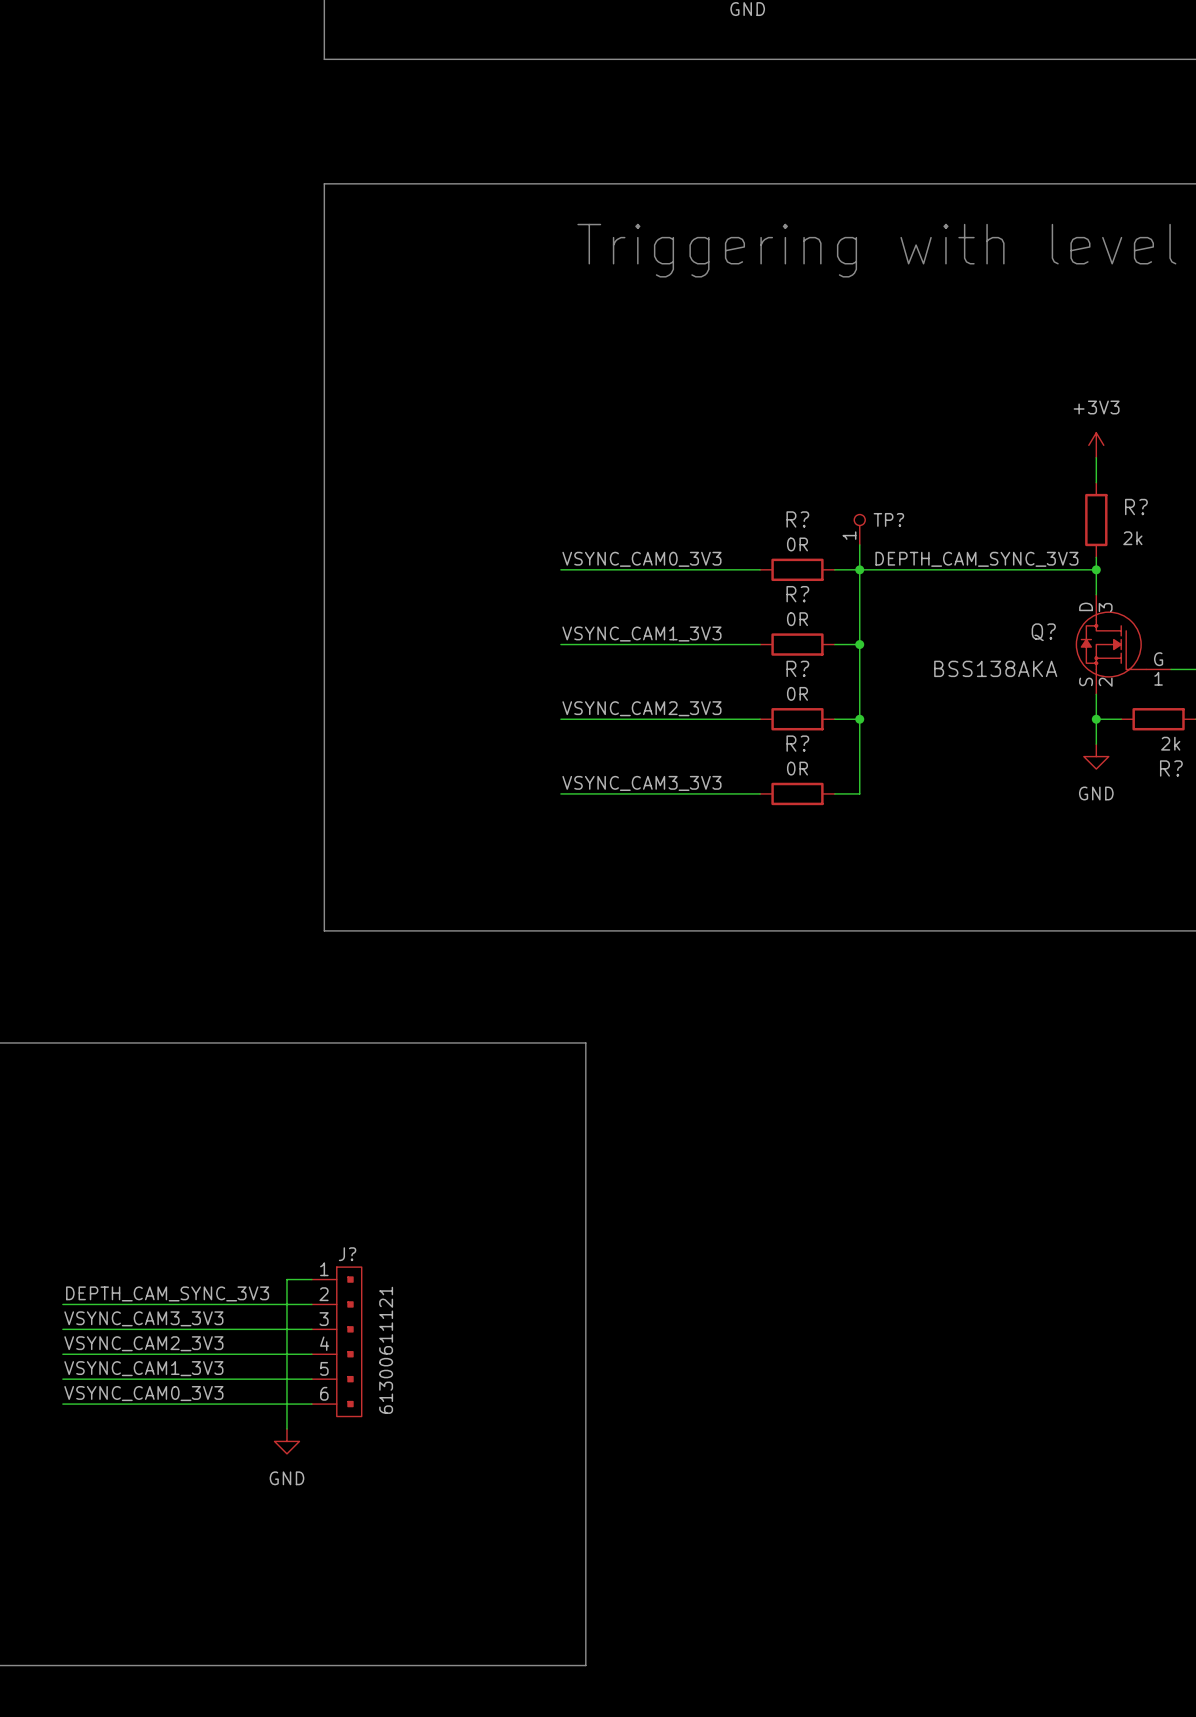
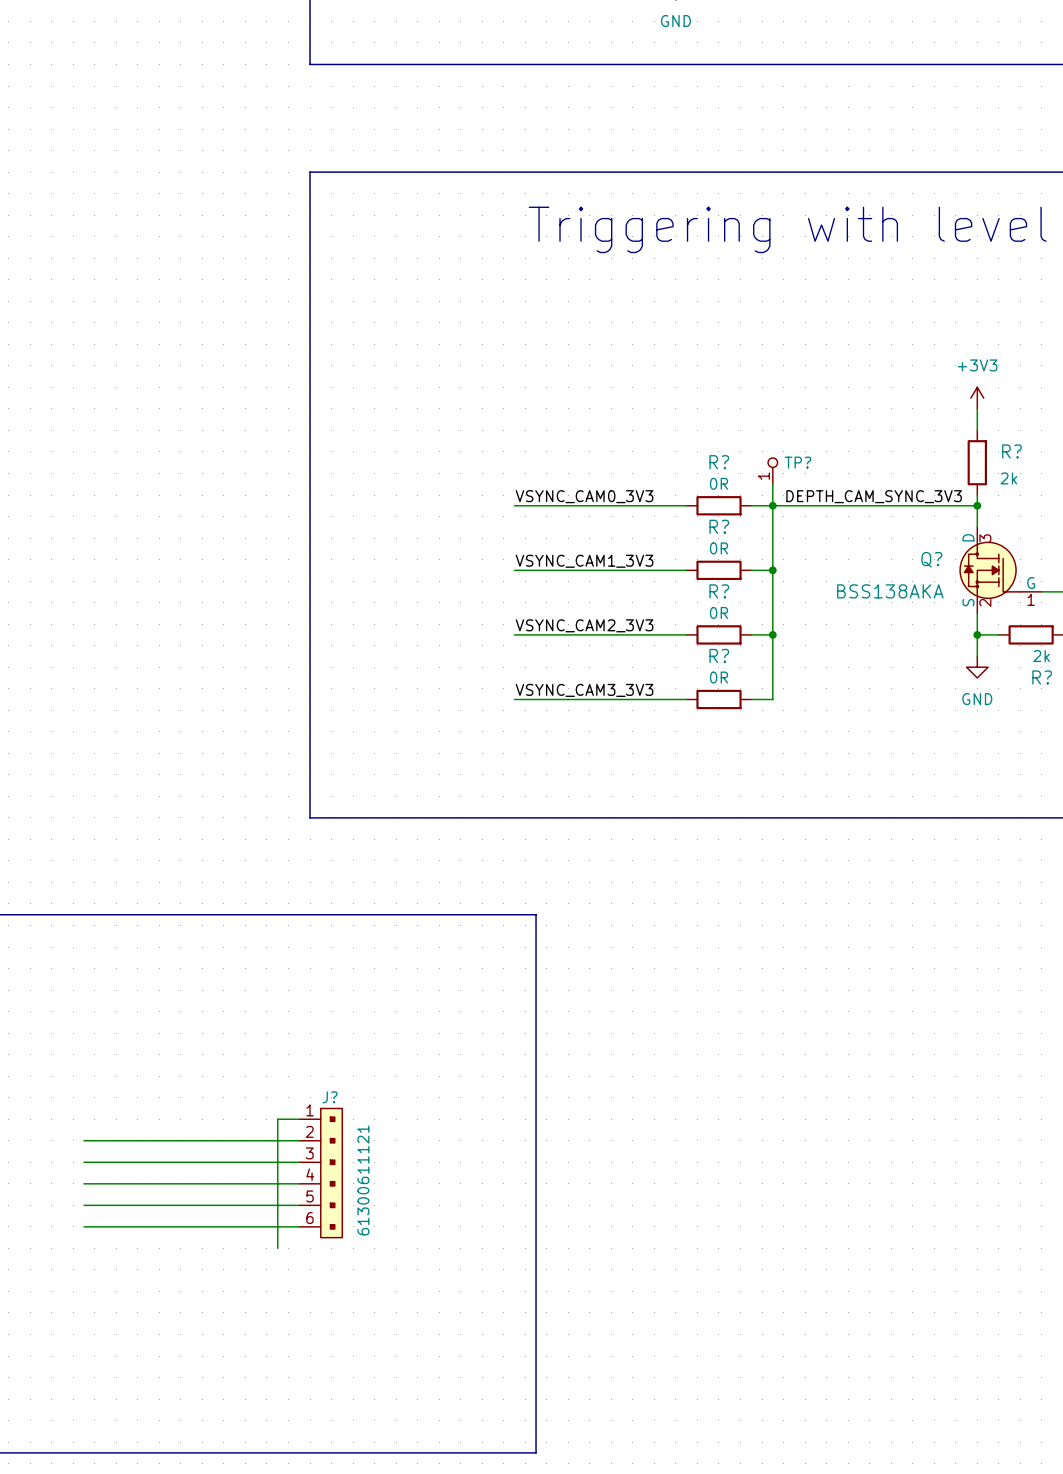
label: DEPTH_CAM_SYNC_3V3 (167, 1293) -> none
label: VSYNC_CAM3_3V3 (143, 1318) -> none
label: VSYNC_CAM2_3V3 (143, 1343) -> none
label: VSYNC_CAM1_3V3 (143, 1368) -> none
label: VSYNC_CAM0_3V3 (143, 1393) -> none
power symbol: GND (286, 1441) -> none

